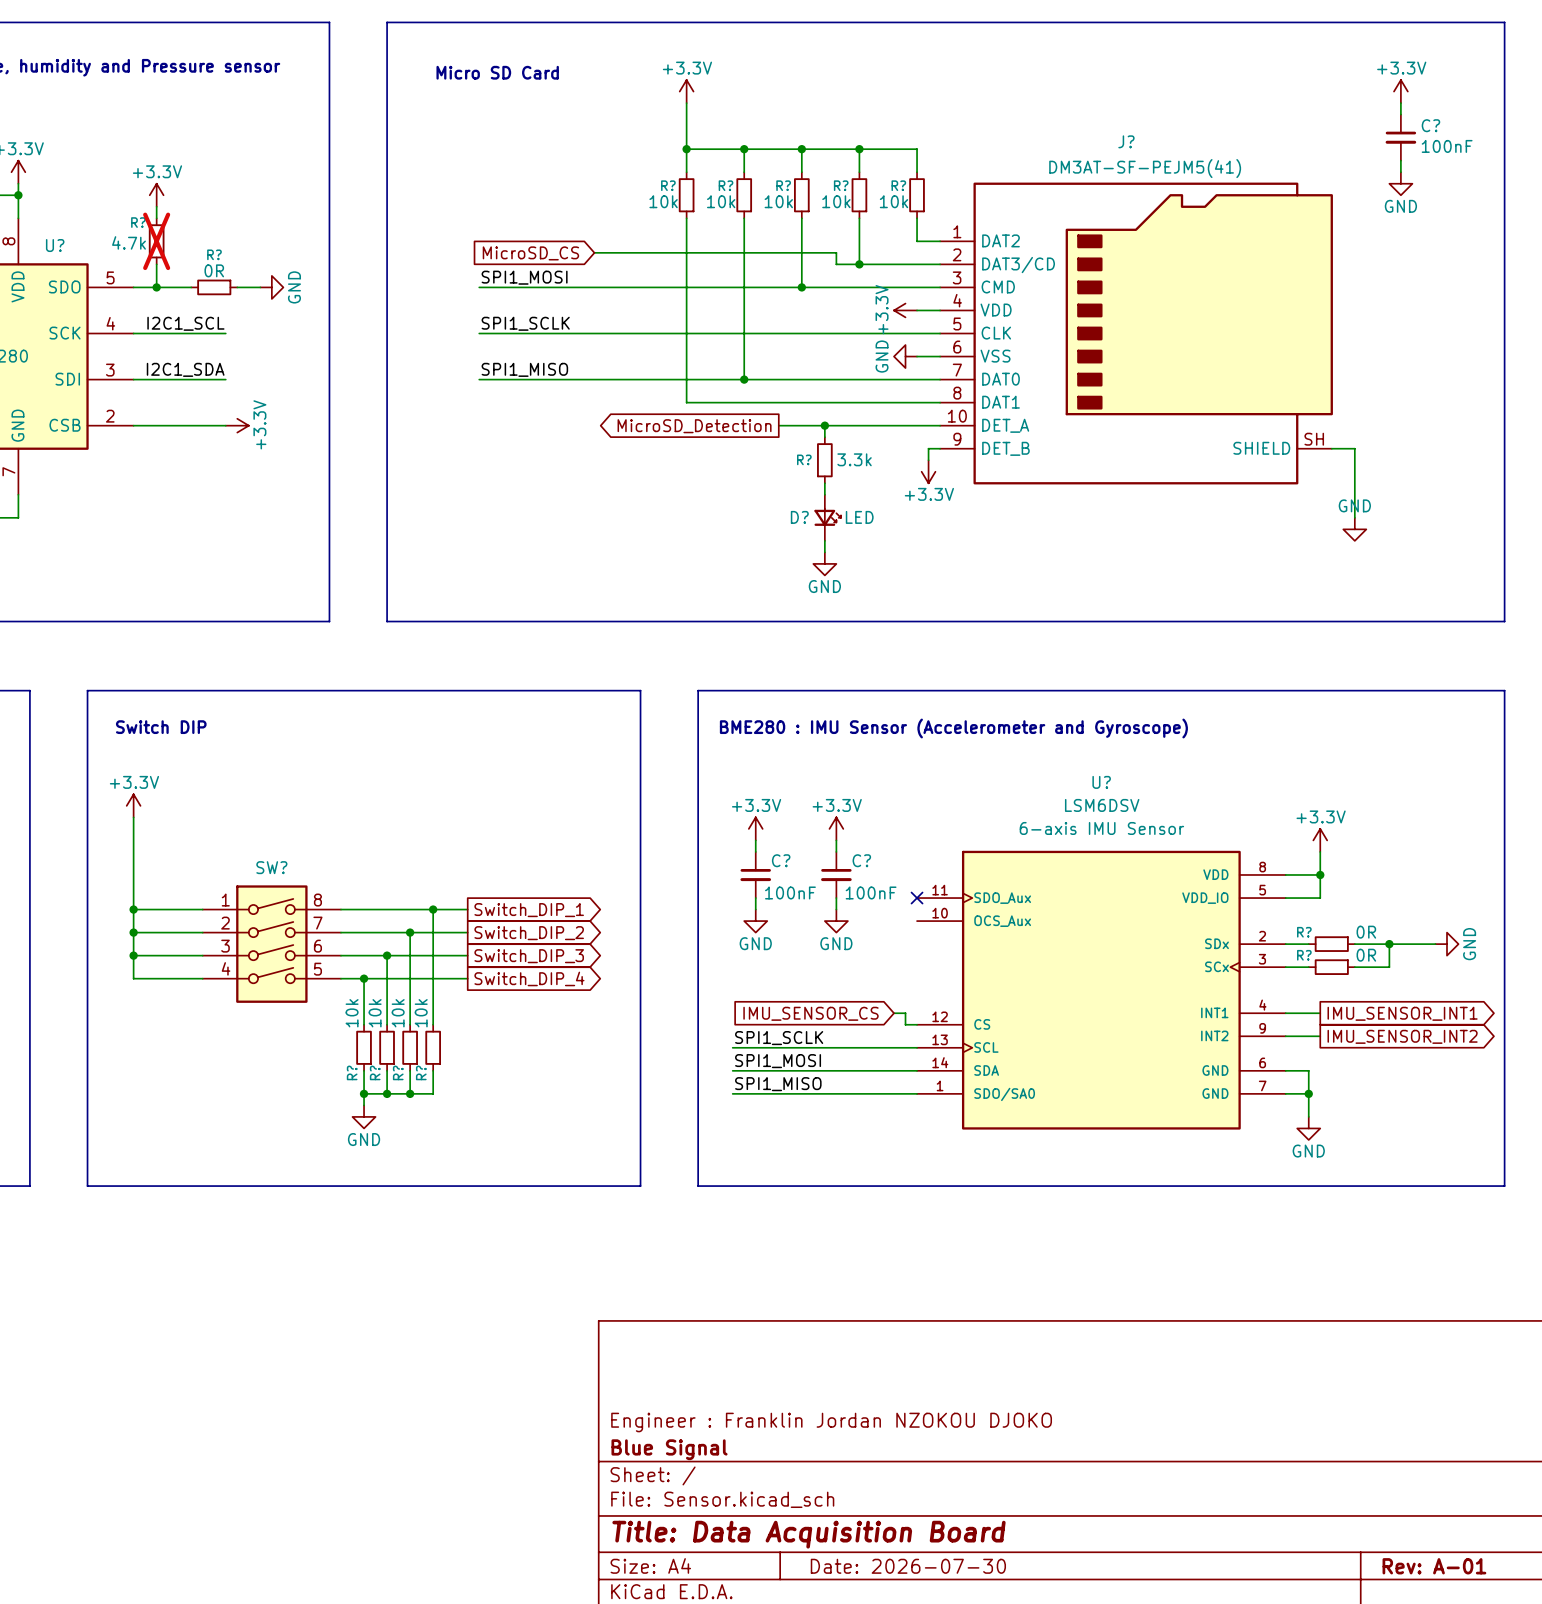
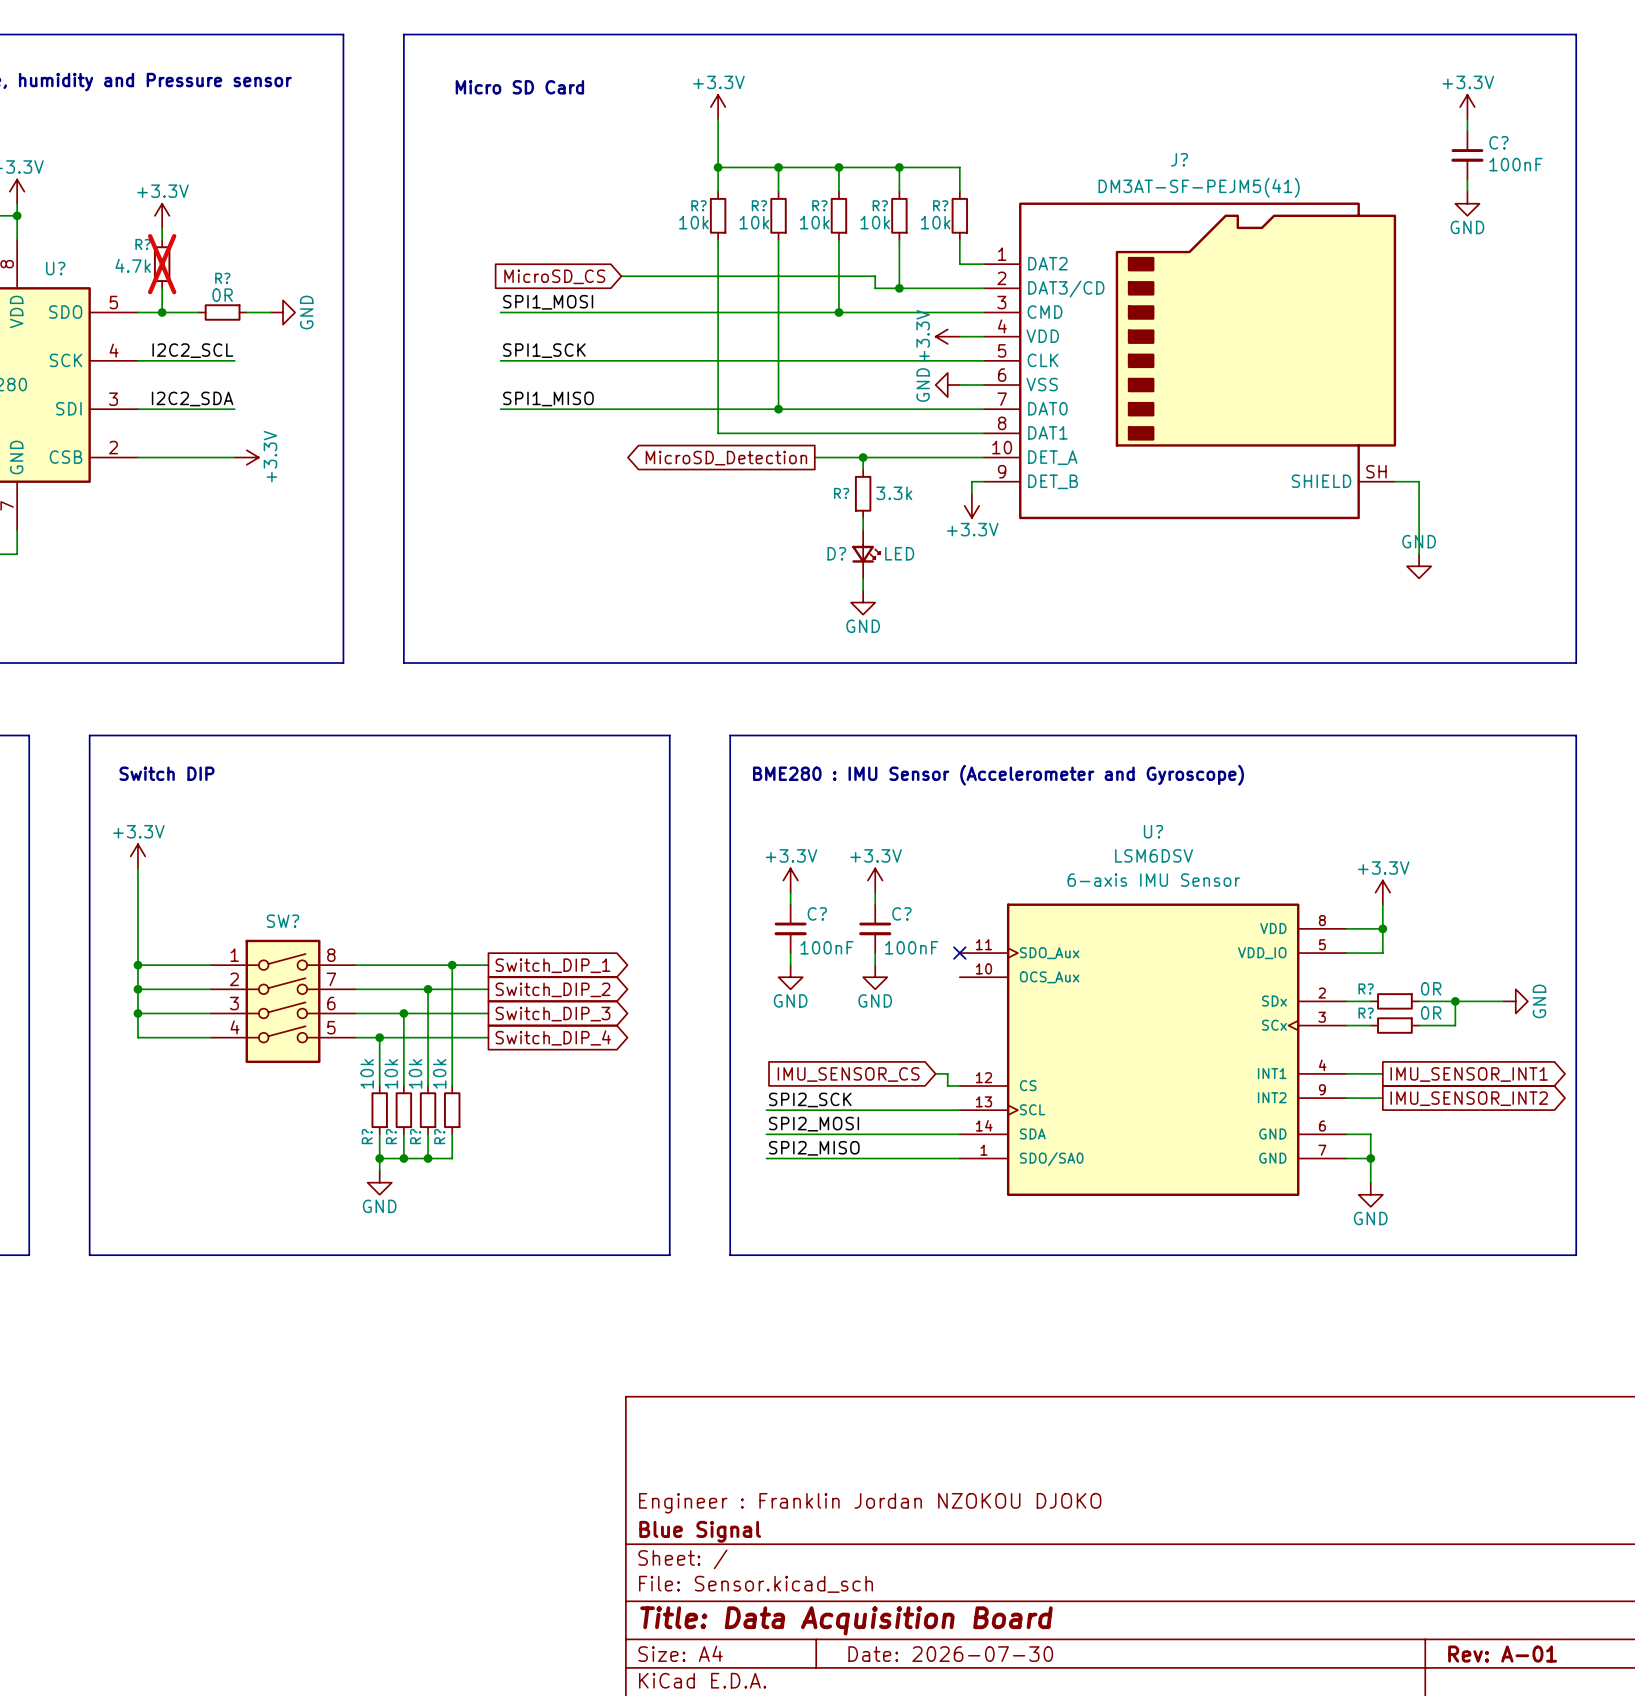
label: I2C1_SCL (185, 323) -> I2C2_SCL (192, 350)
label: SPI1_SCLK (525, 323) -> SPI1_SCK (544, 350)
label: I2C1_SDA (185, 369) -> I2C2_SDA (192, 398)
label: SPI1_SCLK (779, 1038) -> SPI2_SCK (810, 1099)
label: SPI1_MOSI (778, 1061) -> SPI2_MOSI (814, 1124)
label: SPI1_MISO (778, 1084) -> SPI2_MISO (814, 1148)

